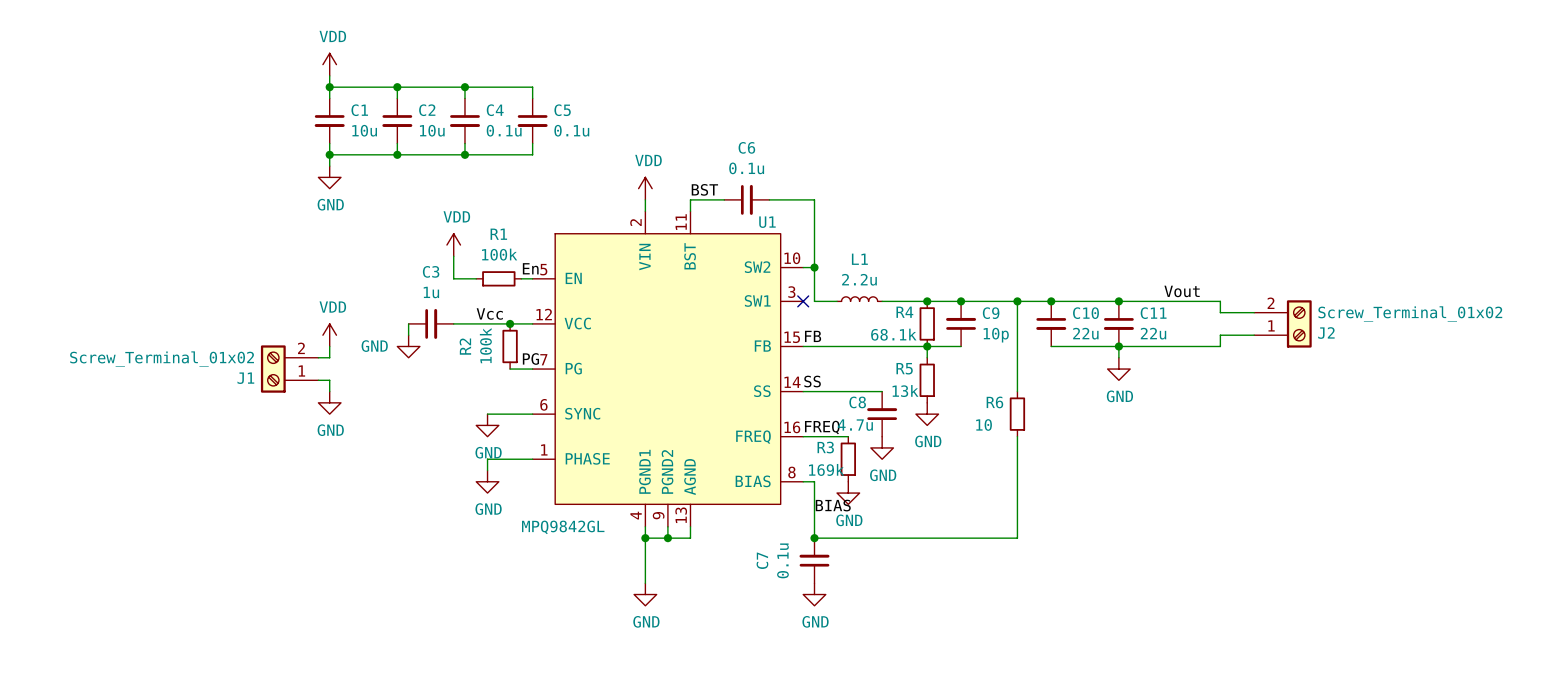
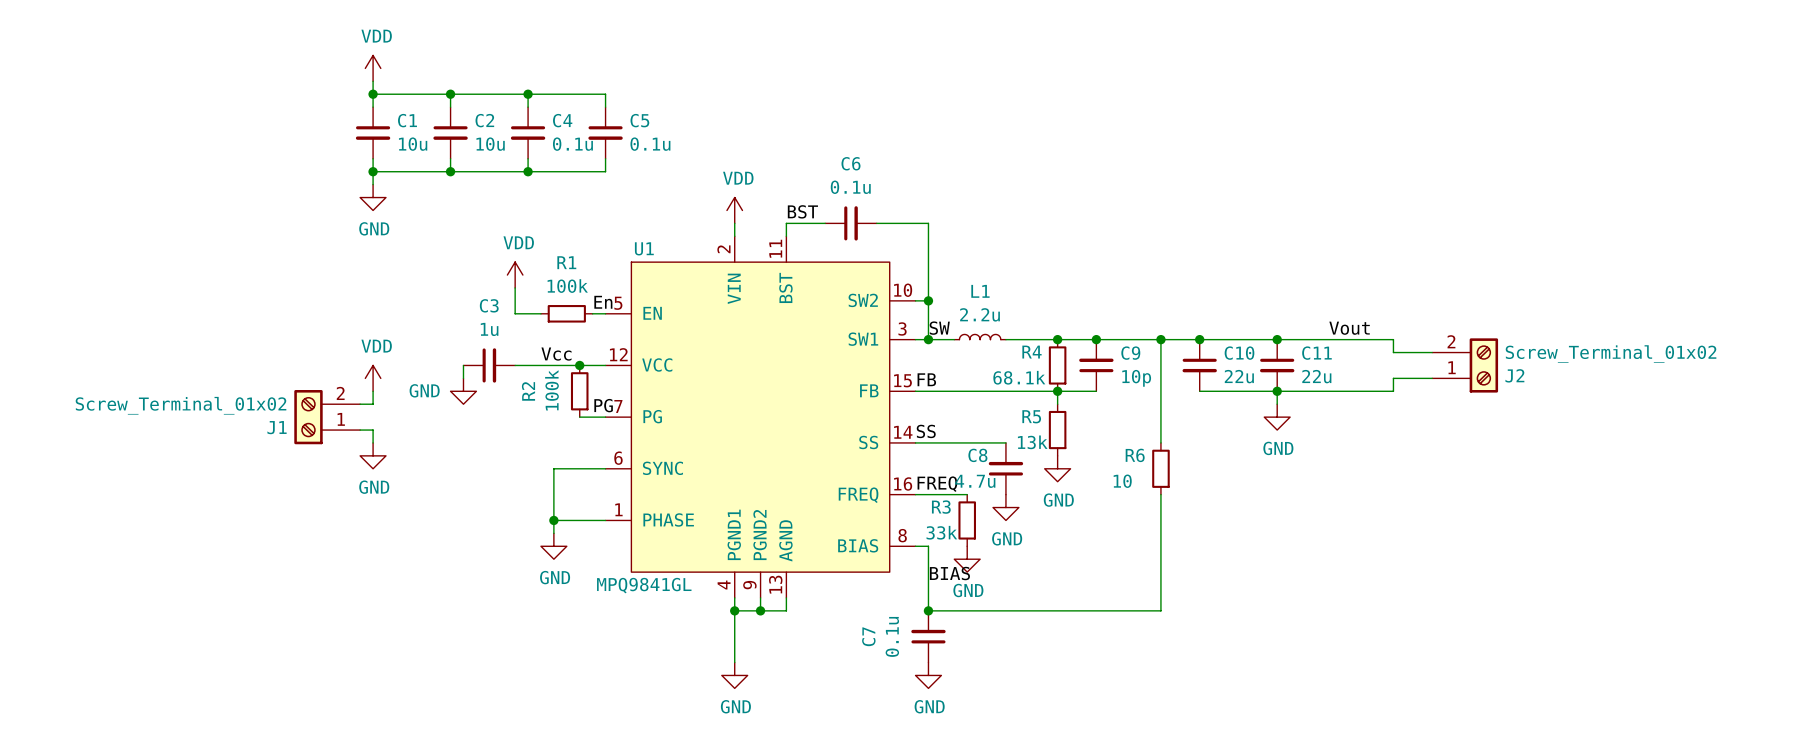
U1 name position: U1 (767, 222) -> U1 (644, 248)
label: none -> SW (939, 328)
wire: none -> (915, 339) (928, 339)
no-connect mark: (803, 301) -> none
junction: none -> (928, 339)
wire: none -> (553, 468) (553, 520)
power symbol: GND (487, 425) -> none
junction: none -> (553, 520)
R3 value: 169k (826, 469) -> 33k (941, 532)
U1 value: MPQ9842GL (563, 527) -> MPQ9841GL (644, 585)

